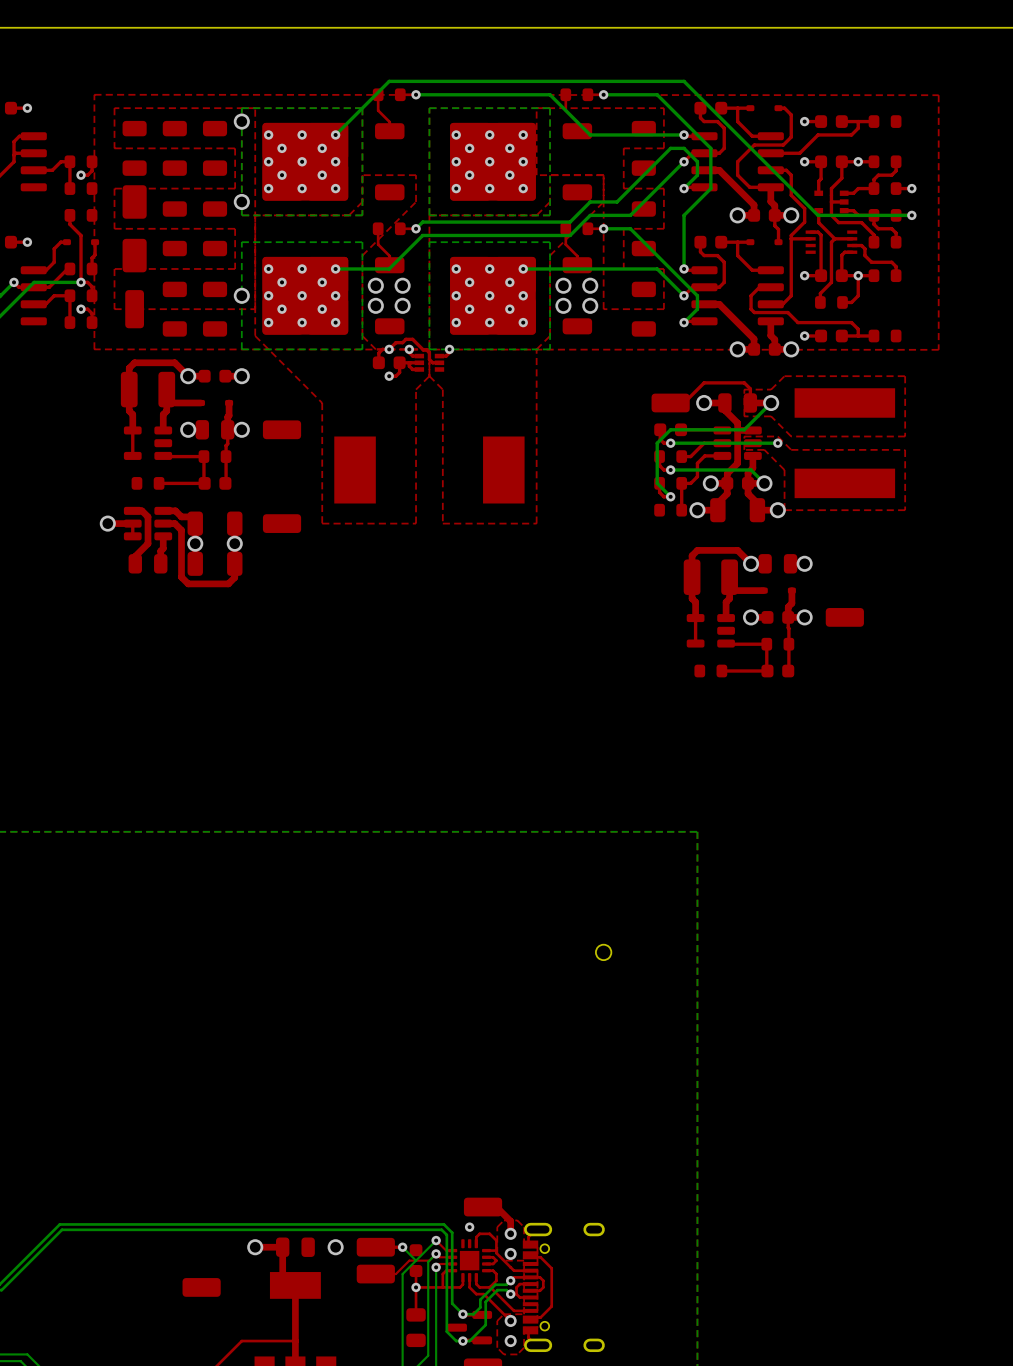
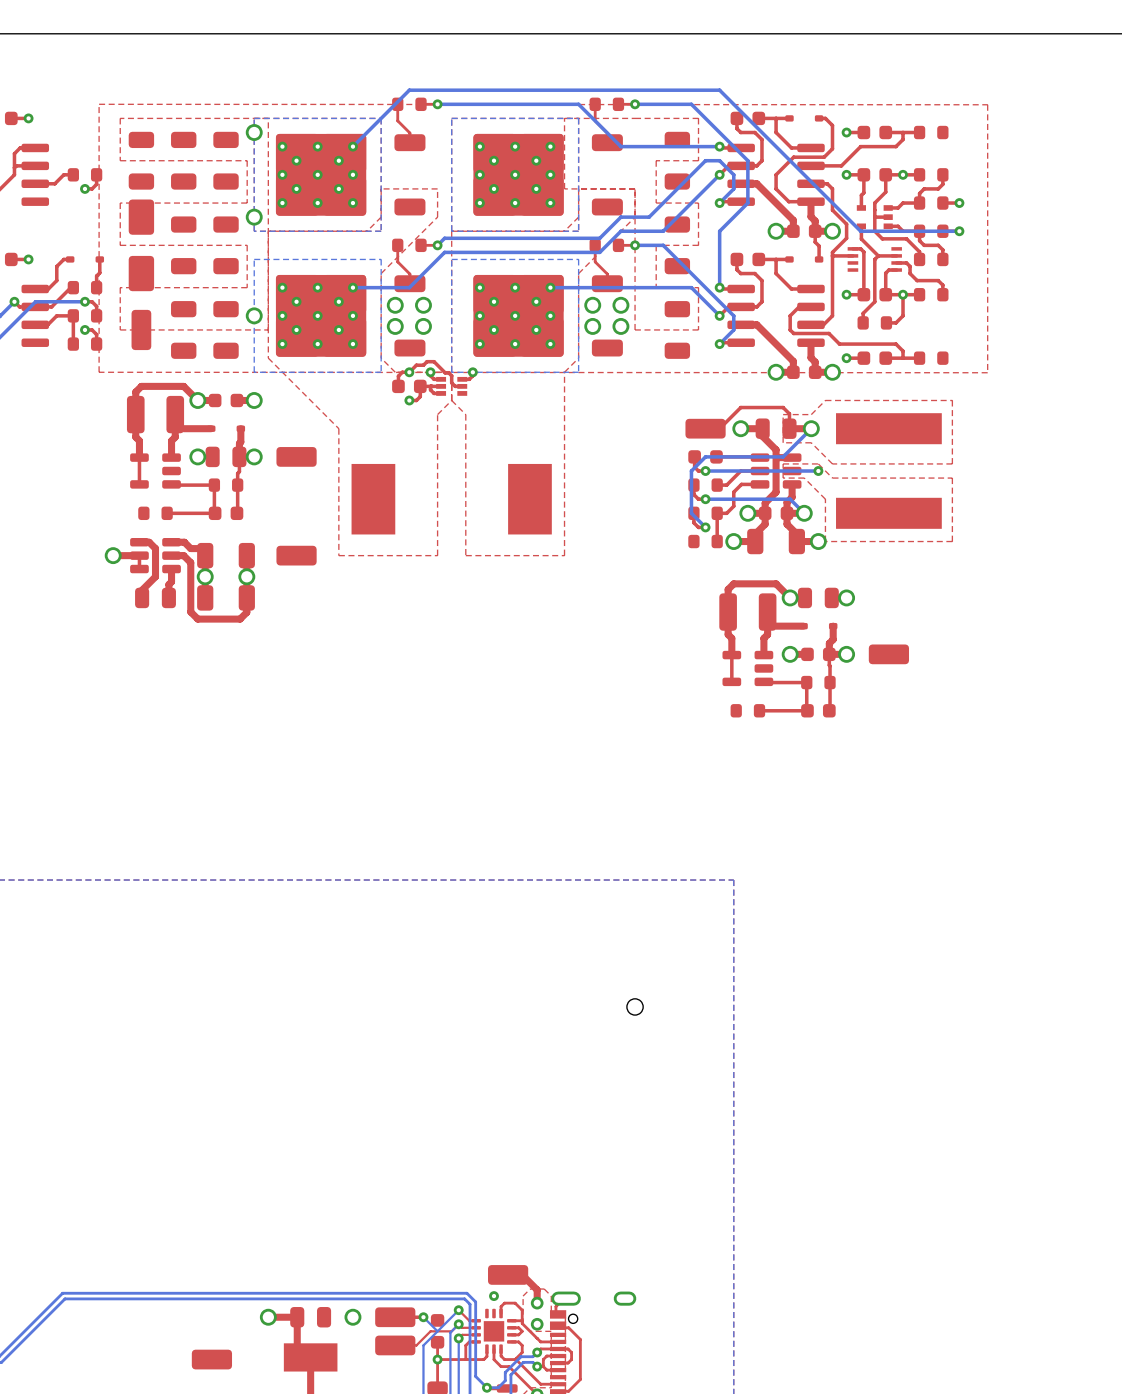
top track: (69, 161) (69, 188) -> none
part: (81, 188) -> none
top track: (69, 215) (69, 224) (81, 235) (81, 282) -> none
part: (81, 215) -> none

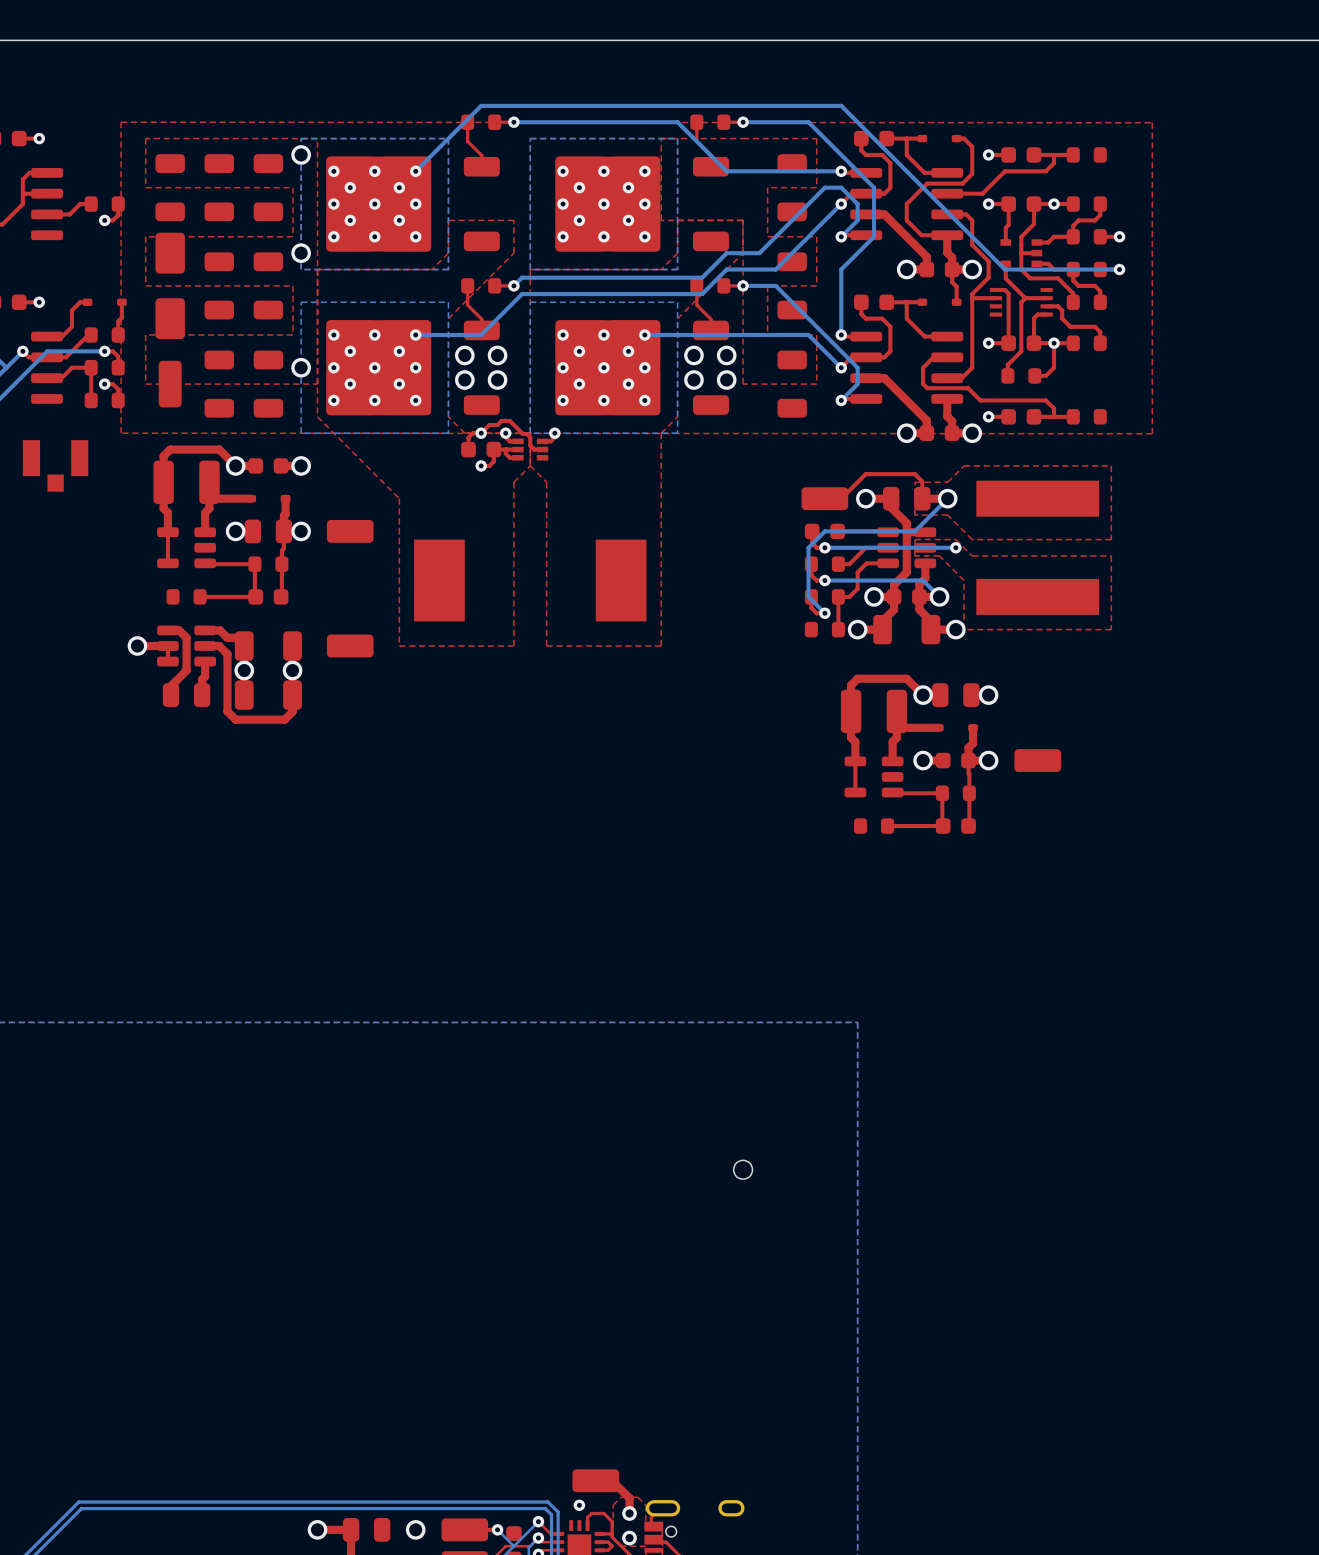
part: none -> (55, 465)

